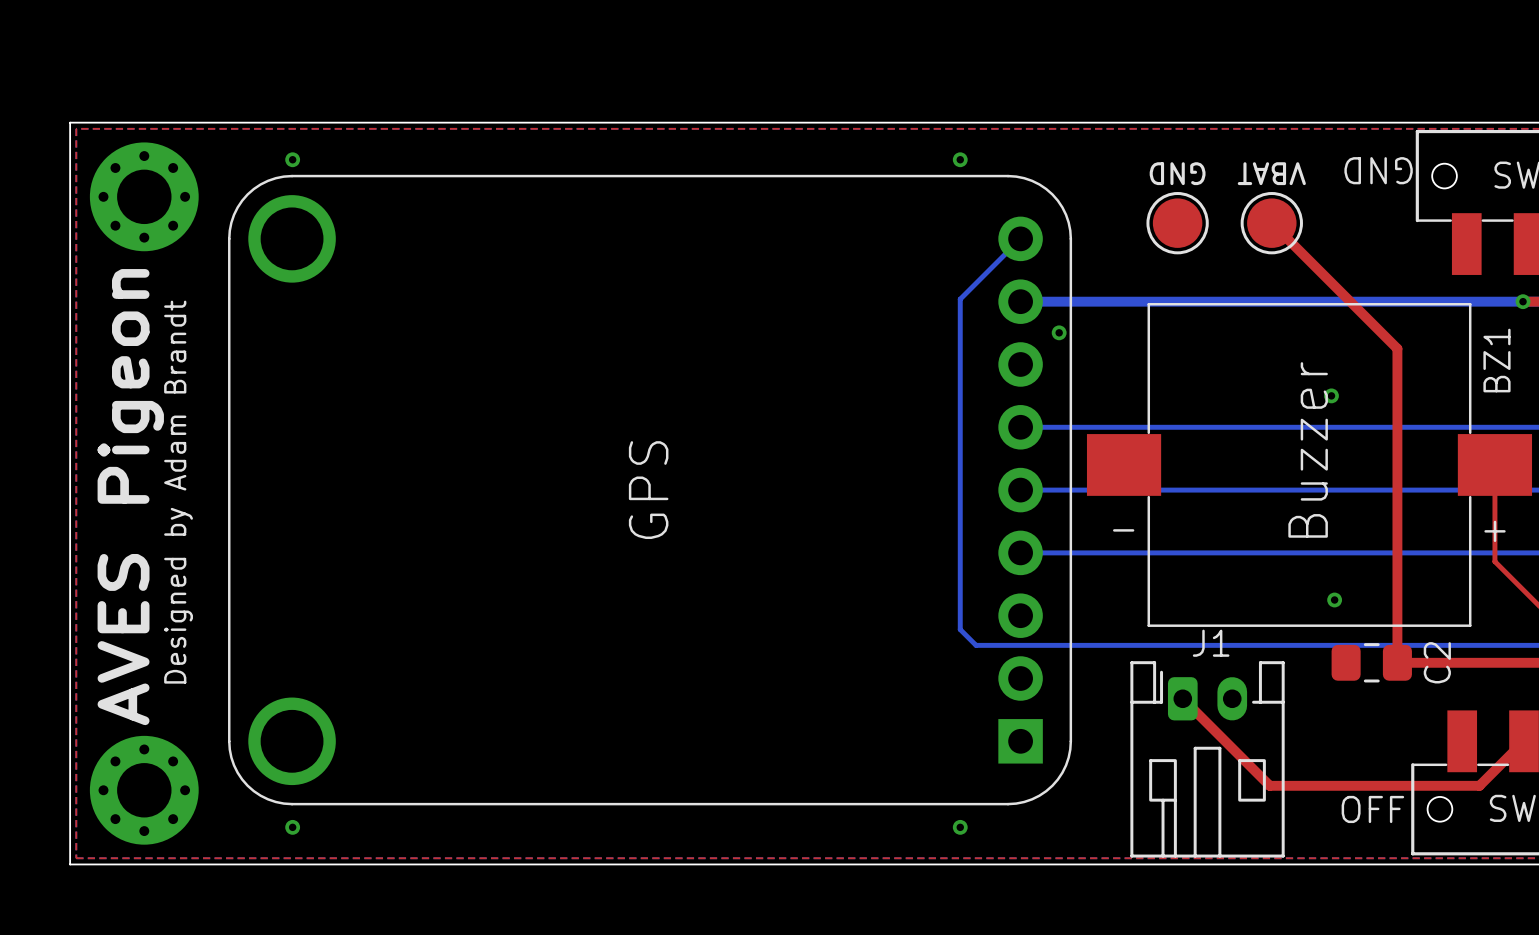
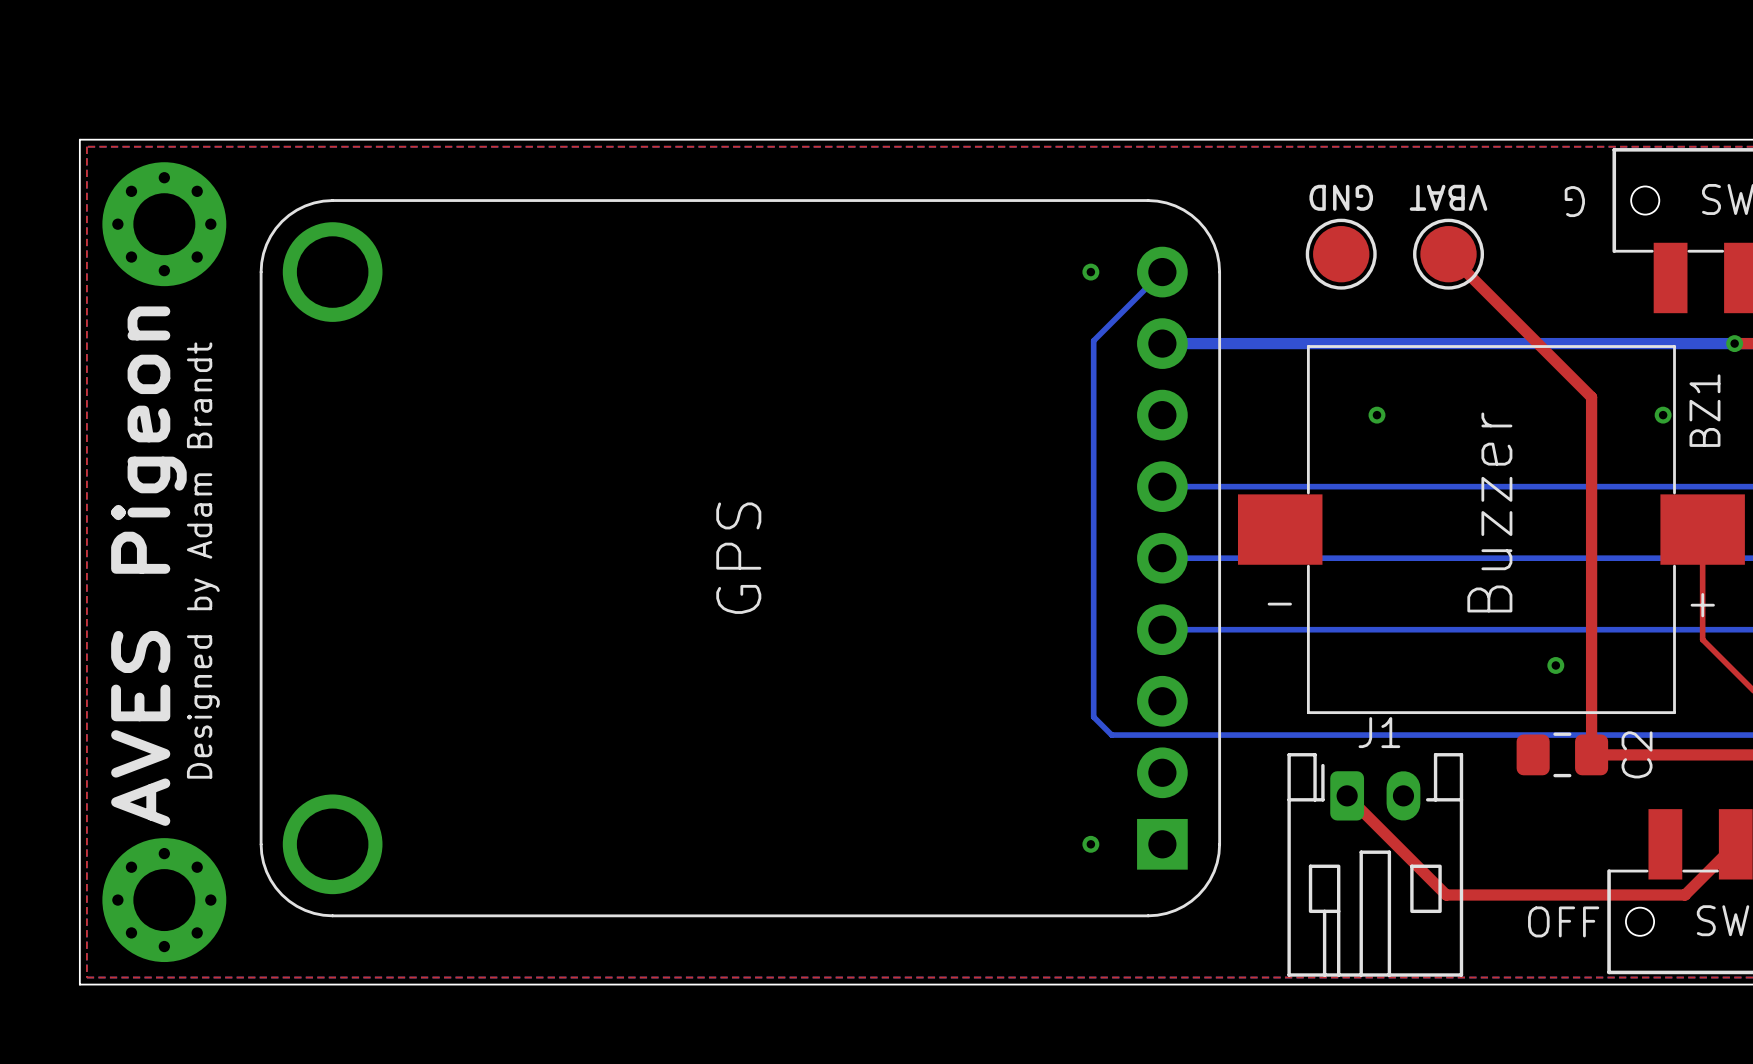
via: (292, 159) -> none
via: (960, 159) -> none
text: GND (1378, 170) -> G (1574, 201)
via: none -> (1090, 272)
via: (1059, 332) -> none
via: none -> (1376, 415)
via: none -> (1663, 415)
via: (1331, 395) -> none
via position: (1334, 600) -> (1555, 665)
via: (292, 827) -> none
via position: (960, 827) -> (1090, 844)

